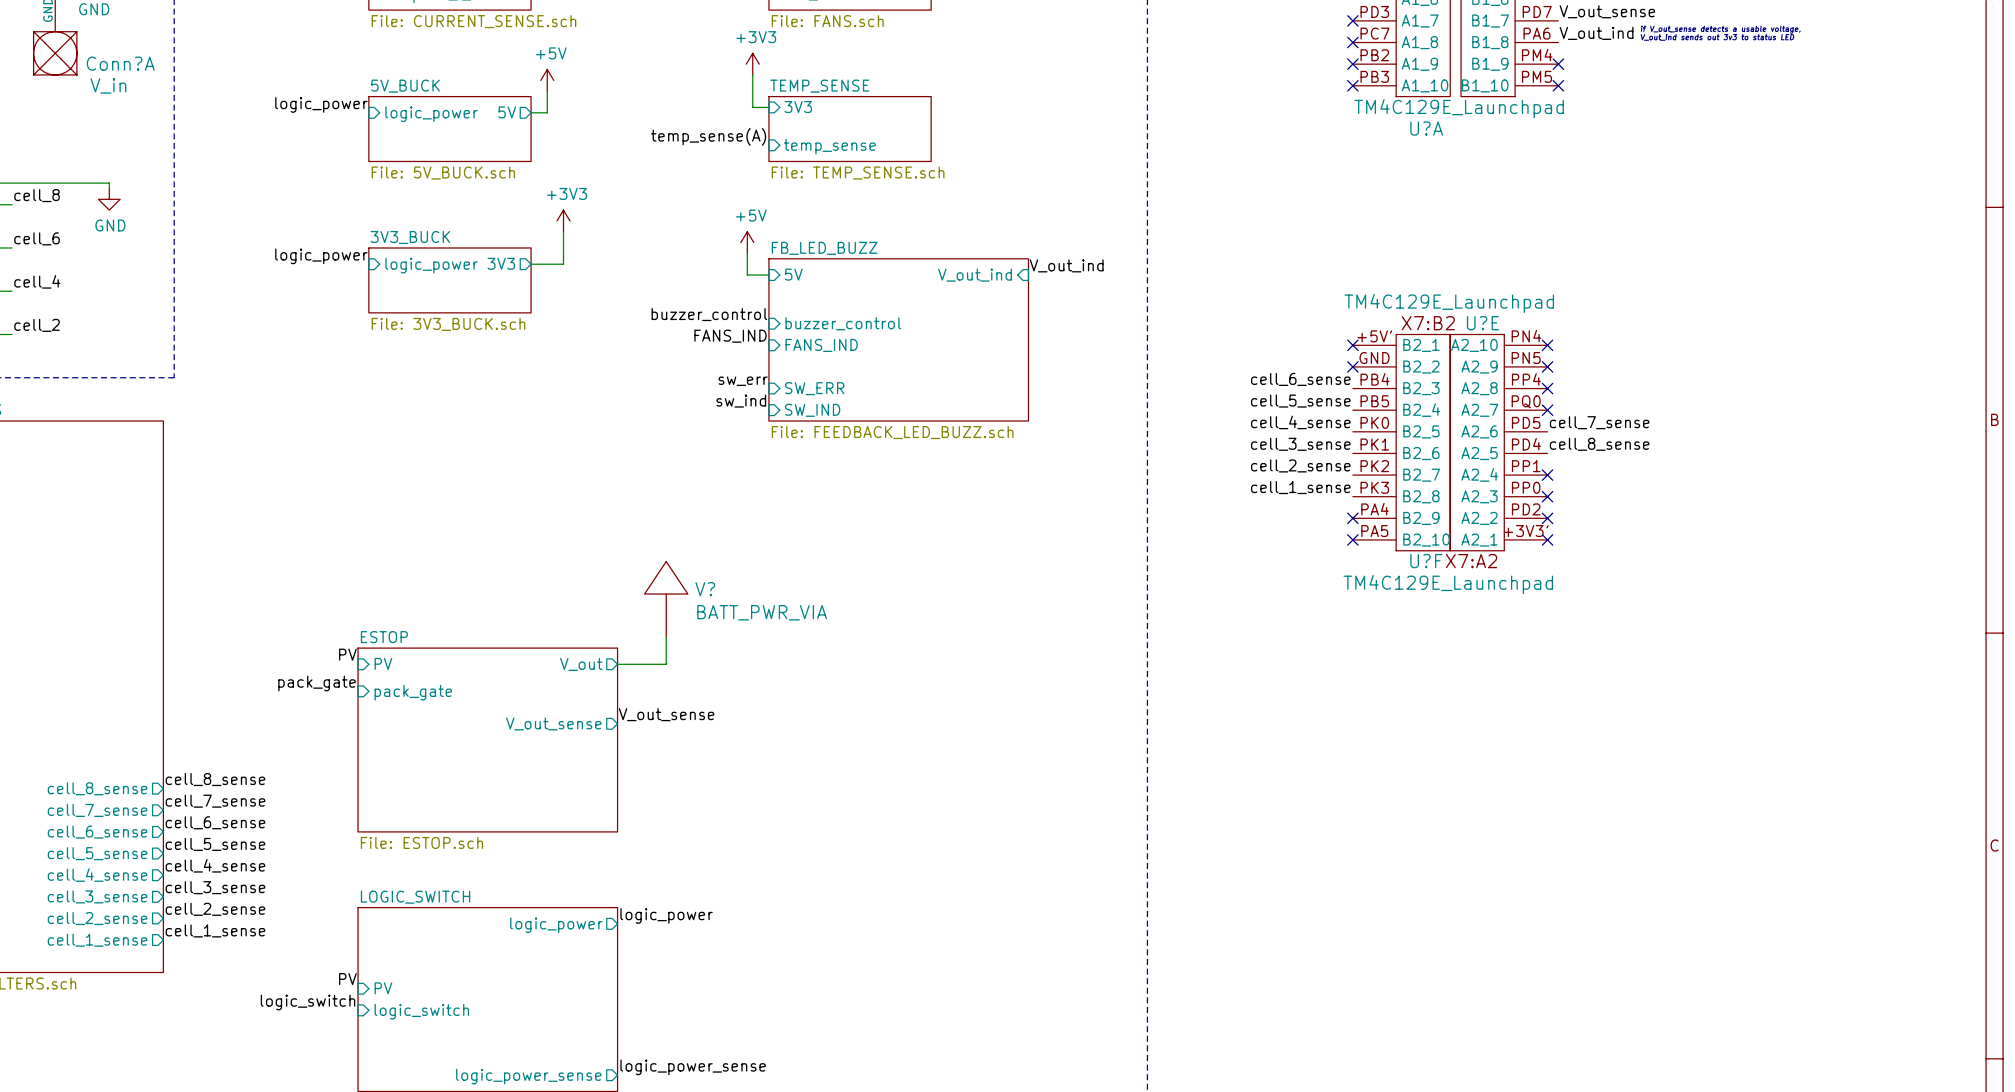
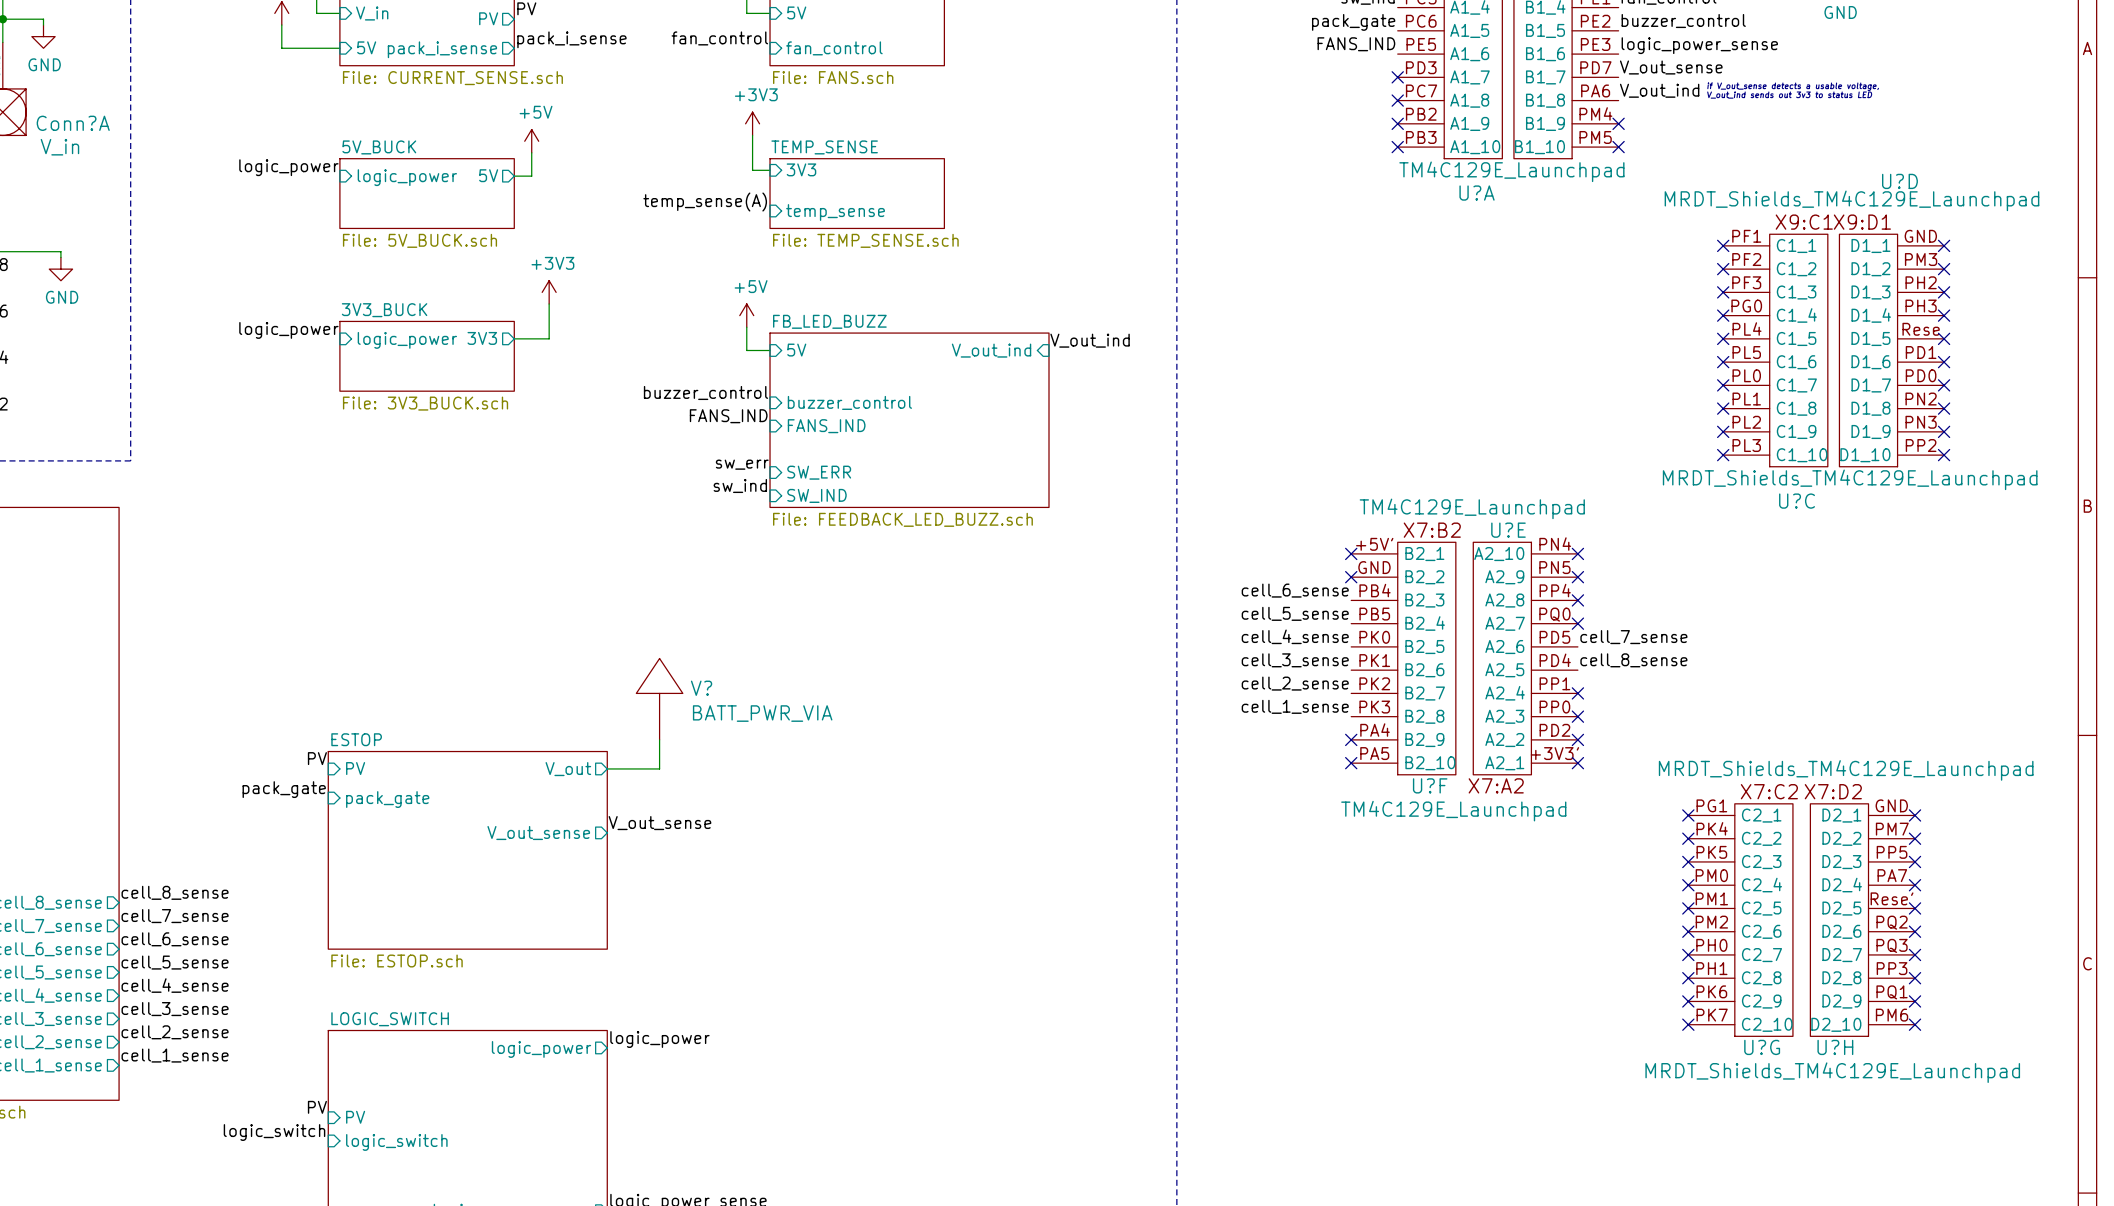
no-connect mark: none -> (1723, 245)
no-connect mark: none -> (1944, 245)
no-connect mark: none -> (1723, 269)
no-connect mark: none -> (1944, 269)
no-connect mark: none -> (1723, 292)
no-connect mark: none -> (1944, 292)
no-connect mark: none -> (1723, 315)
no-connect mark: none -> (1944, 315)
no-connect mark: none -> (1723, 338)
no-connect mark: none -> (1944, 338)
U?C: none -> MRDT_Shields_TM4C129E_Launchpad (1775, 350)
U?D: none -> MRDT_Shields_TM4C129E_Launchpad (1891, 350)
no-connect mark: none -> (1723, 362)
no-connect mark: none -> (1944, 362)
no-connect mark: none -> (1723, 385)
no-connect mark: none -> (1944, 385)
no-connect mark: none -> (1723, 408)
no-connect mark: none -> (1944, 408)
no-connect mark: (1352, 345) -> none
no-connect mark: (1547, 345) -> none
no-connect mark: none -> (1723, 431)
no-connect mark: none -> (1944, 431)
no-connect mark: (1352, 366) -> none
no-connect mark: (1547, 366) -> none
no-connect mark: none -> (1723, 455)
no-connect mark: none -> (1944, 455)
label position: cell_6_sense (1300, 379) -> cell_6_sense (1295, 590)
no-connect mark: (1547, 388) -> none
label position: cell_5_sense (1300, 401) -> cell_5_sense (1295, 613)
no-connect mark: (1547, 410) -> none
label position: cell_4_sense (1300, 422) -> cell_4_sense (1295, 636)
label position: cell_7_sense (1599, 422) -> cell_7_sense (1633, 637)
U?F position: (1401, 442) -> (1403, 658)
U?E position: (1498, 442) -> (1525, 658)
label position: cell_3_sense (1300, 444) -> cell_3_sense (1295, 660)
label position: cell_8_sense (1599, 444) -> cell_8_sense (1633, 660)
no-connect mark: none -> (1351, 553)
no-connect mark: none -> (1577, 553)
label position: cell_2_sense (1300, 465) -> cell_2_sense (1295, 683)
no-connect mark: (1547, 475) -> none
no-connect mark: none -> (1351, 577)
no-connect mark: none -> (1577, 577)
label position: cell_1_sense (1300, 487) -> cell_1_sense (1295, 706)
no-connect mark: (1547, 496) -> none
no-connect mark: none -> (1577, 600)
no-connect mark: (1352, 518) -> none
no-connect mark: (1547, 518) -> none
no-connect mark: none -> (1577, 623)
no-connect mark: (1352, 539) -> none
no-connect mark: (1547, 539) -> none
no-connect mark: none -> (1577, 693)
no-connect mark: none -> (1577, 716)
no-connect mark: none -> (1351, 739)
no-connect mark: none -> (1577, 739)
no-connect mark: none -> (1351, 763)
no-connect mark: none -> (1577, 763)
no-connect mark: none -> (1688, 815)
no-connect mark: none -> (1915, 815)
no-connect mark: none -> (1688, 838)
no-connect mark: none -> (1915, 838)
no-connect mark: none -> (1688, 861)
no-connect mark: none -> (1915, 861)
no-connect mark: none -> (1688, 885)
no-connect mark: none -> (1915, 885)
no-connect mark: none -> (1688, 908)
no-connect mark: none -> (1915, 908)
U?G: none -> MRDT_Shields_TM4C129E_Launchpad (1740, 920)
U?H: none -> MRDT_Shields_TM4C129E_Launchpad (1862, 920)
no-connect mark: none -> (1688, 931)
no-connect mark: none -> (1915, 931)
no-connect mark: none -> (1688, 954)
no-connect mark: none -> (1915, 954)
no-connect mark: none -> (1688, 978)
no-connect mark: none -> (1915, 978)
no-connect mark: none -> (1688, 1001)
no-connect mark: none -> (1915, 1001)
no-connect mark: none -> (1688, 1024)
no-connect mark: none -> (1915, 1024)

